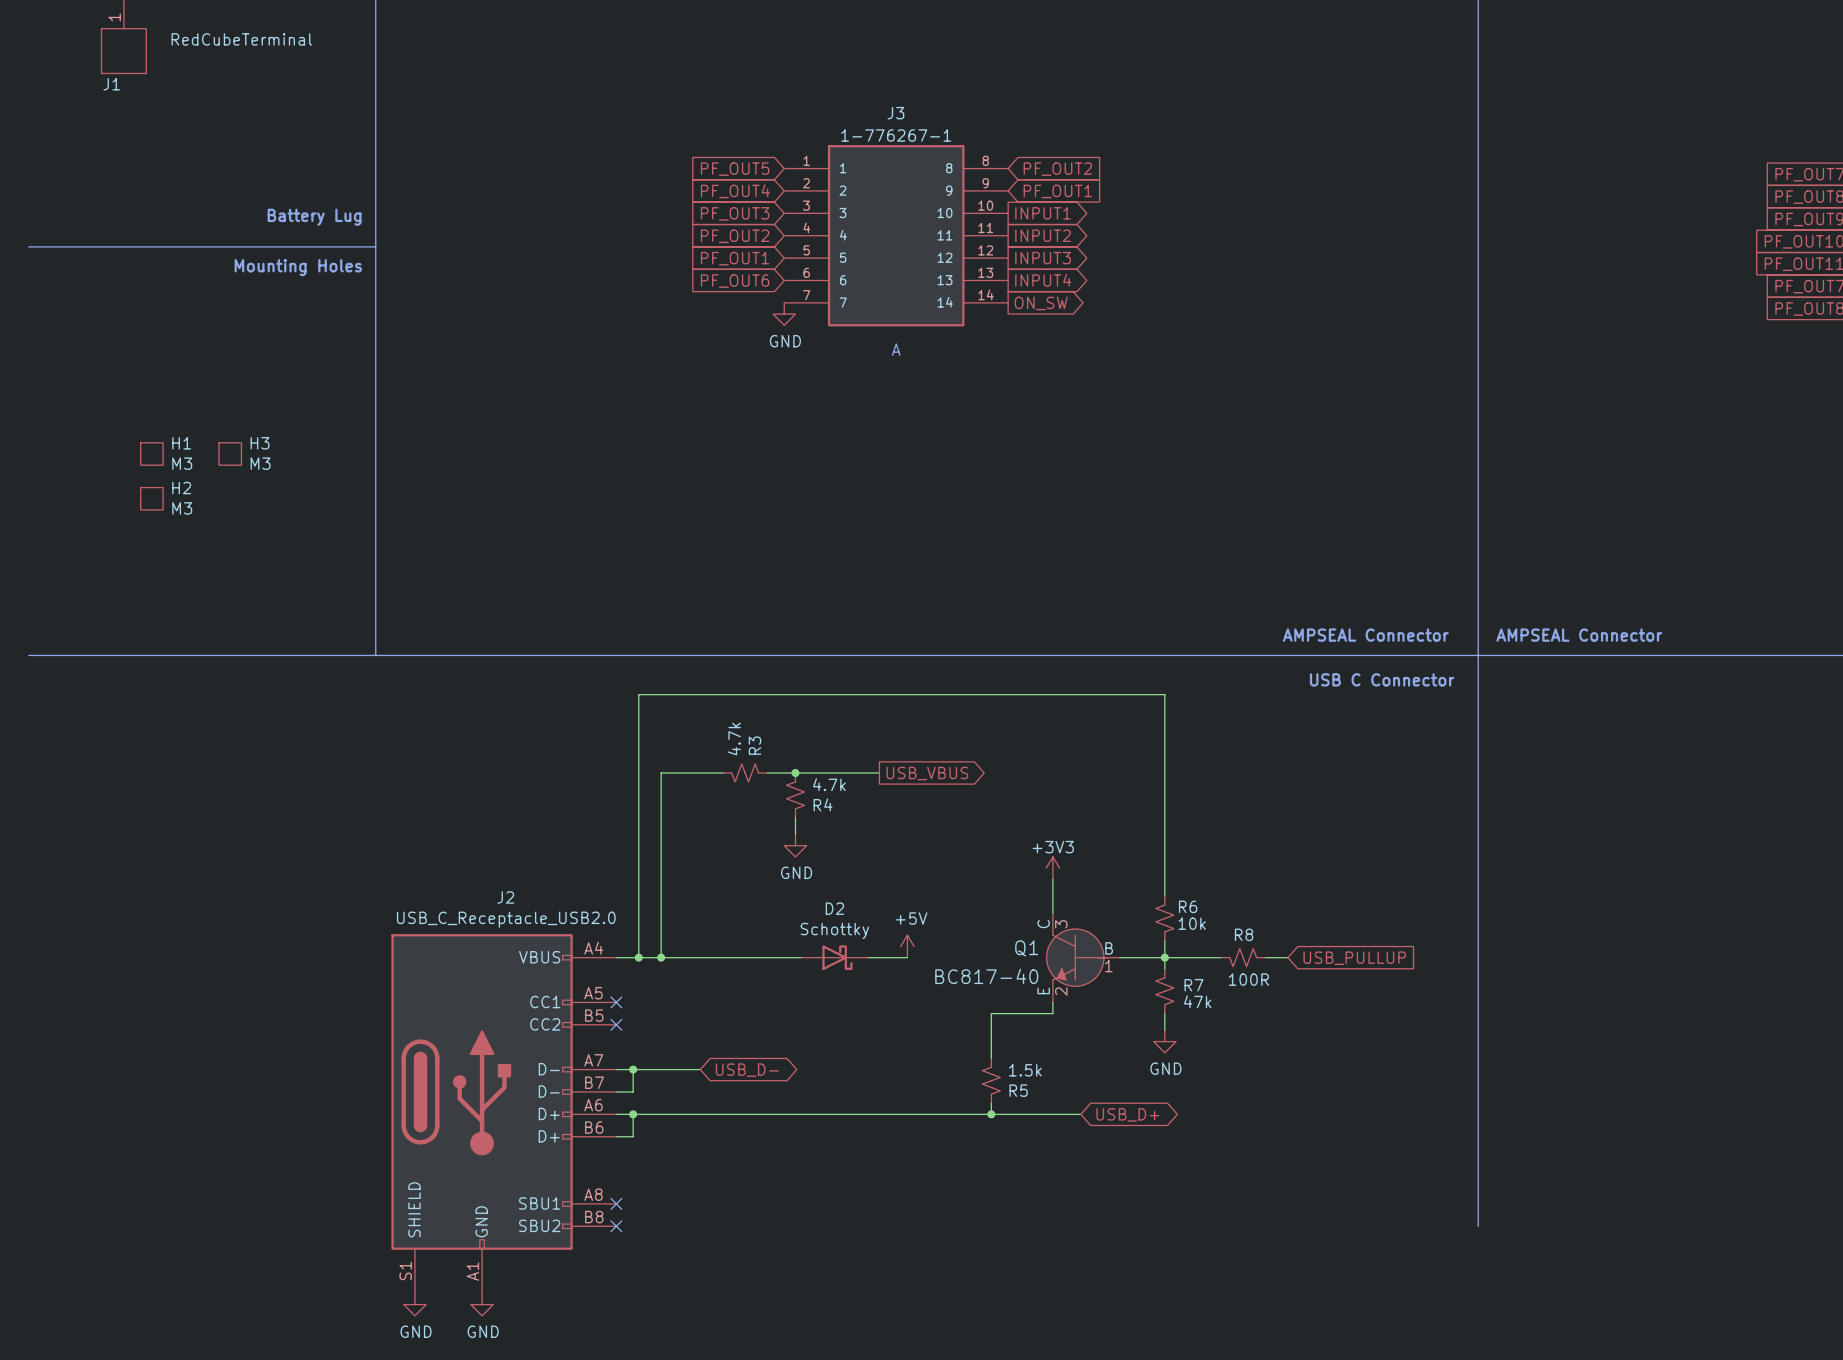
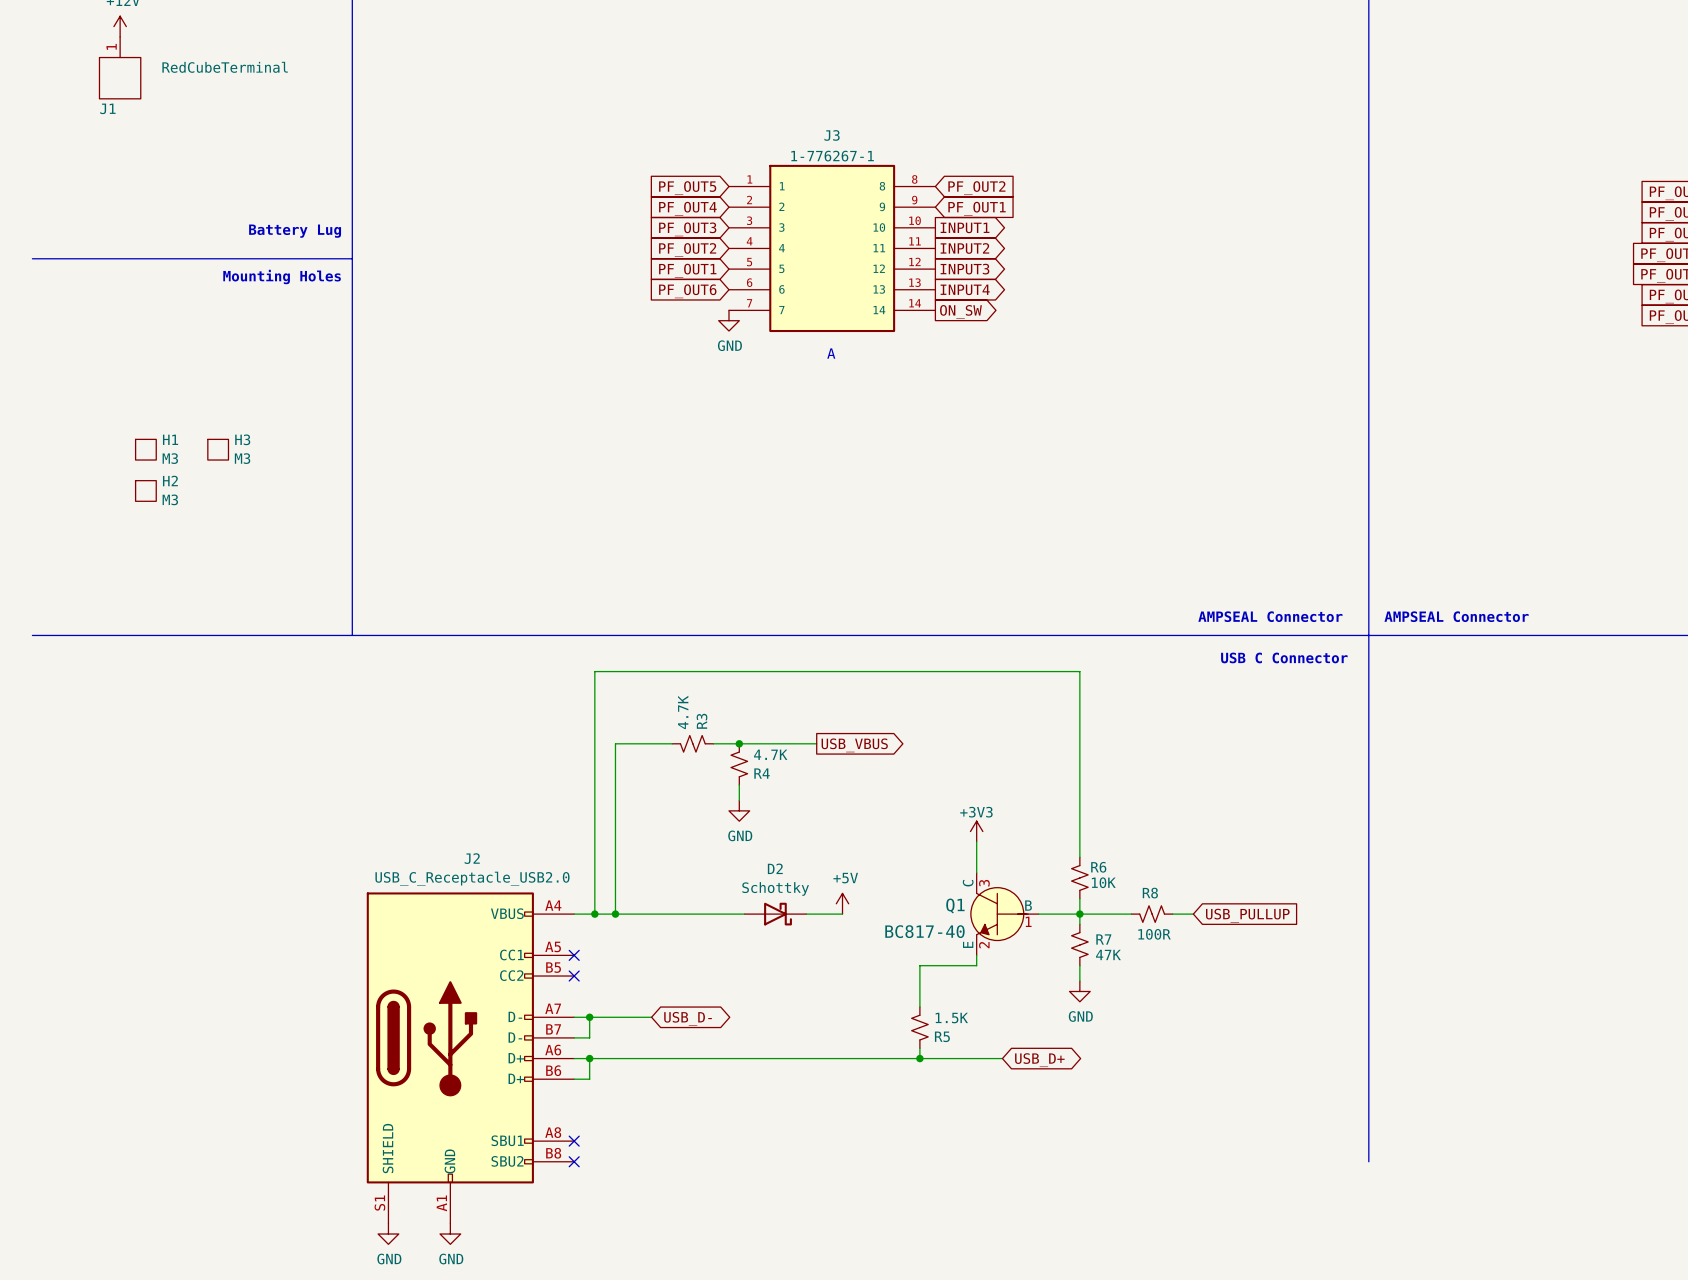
R3 value: 4.7k (734, 739) -> 4.7K (683, 712)
R4 value: 4.7k (829, 784) -> 4.7K (770, 754)
R6 value: 10k (1192, 923) -> 10K (1103, 882)
R7 value: 47k (1197, 1001) -> 47K (1108, 954)
R5 value: 1.5k (1025, 1070) -> 1.5K (951, 1018)

